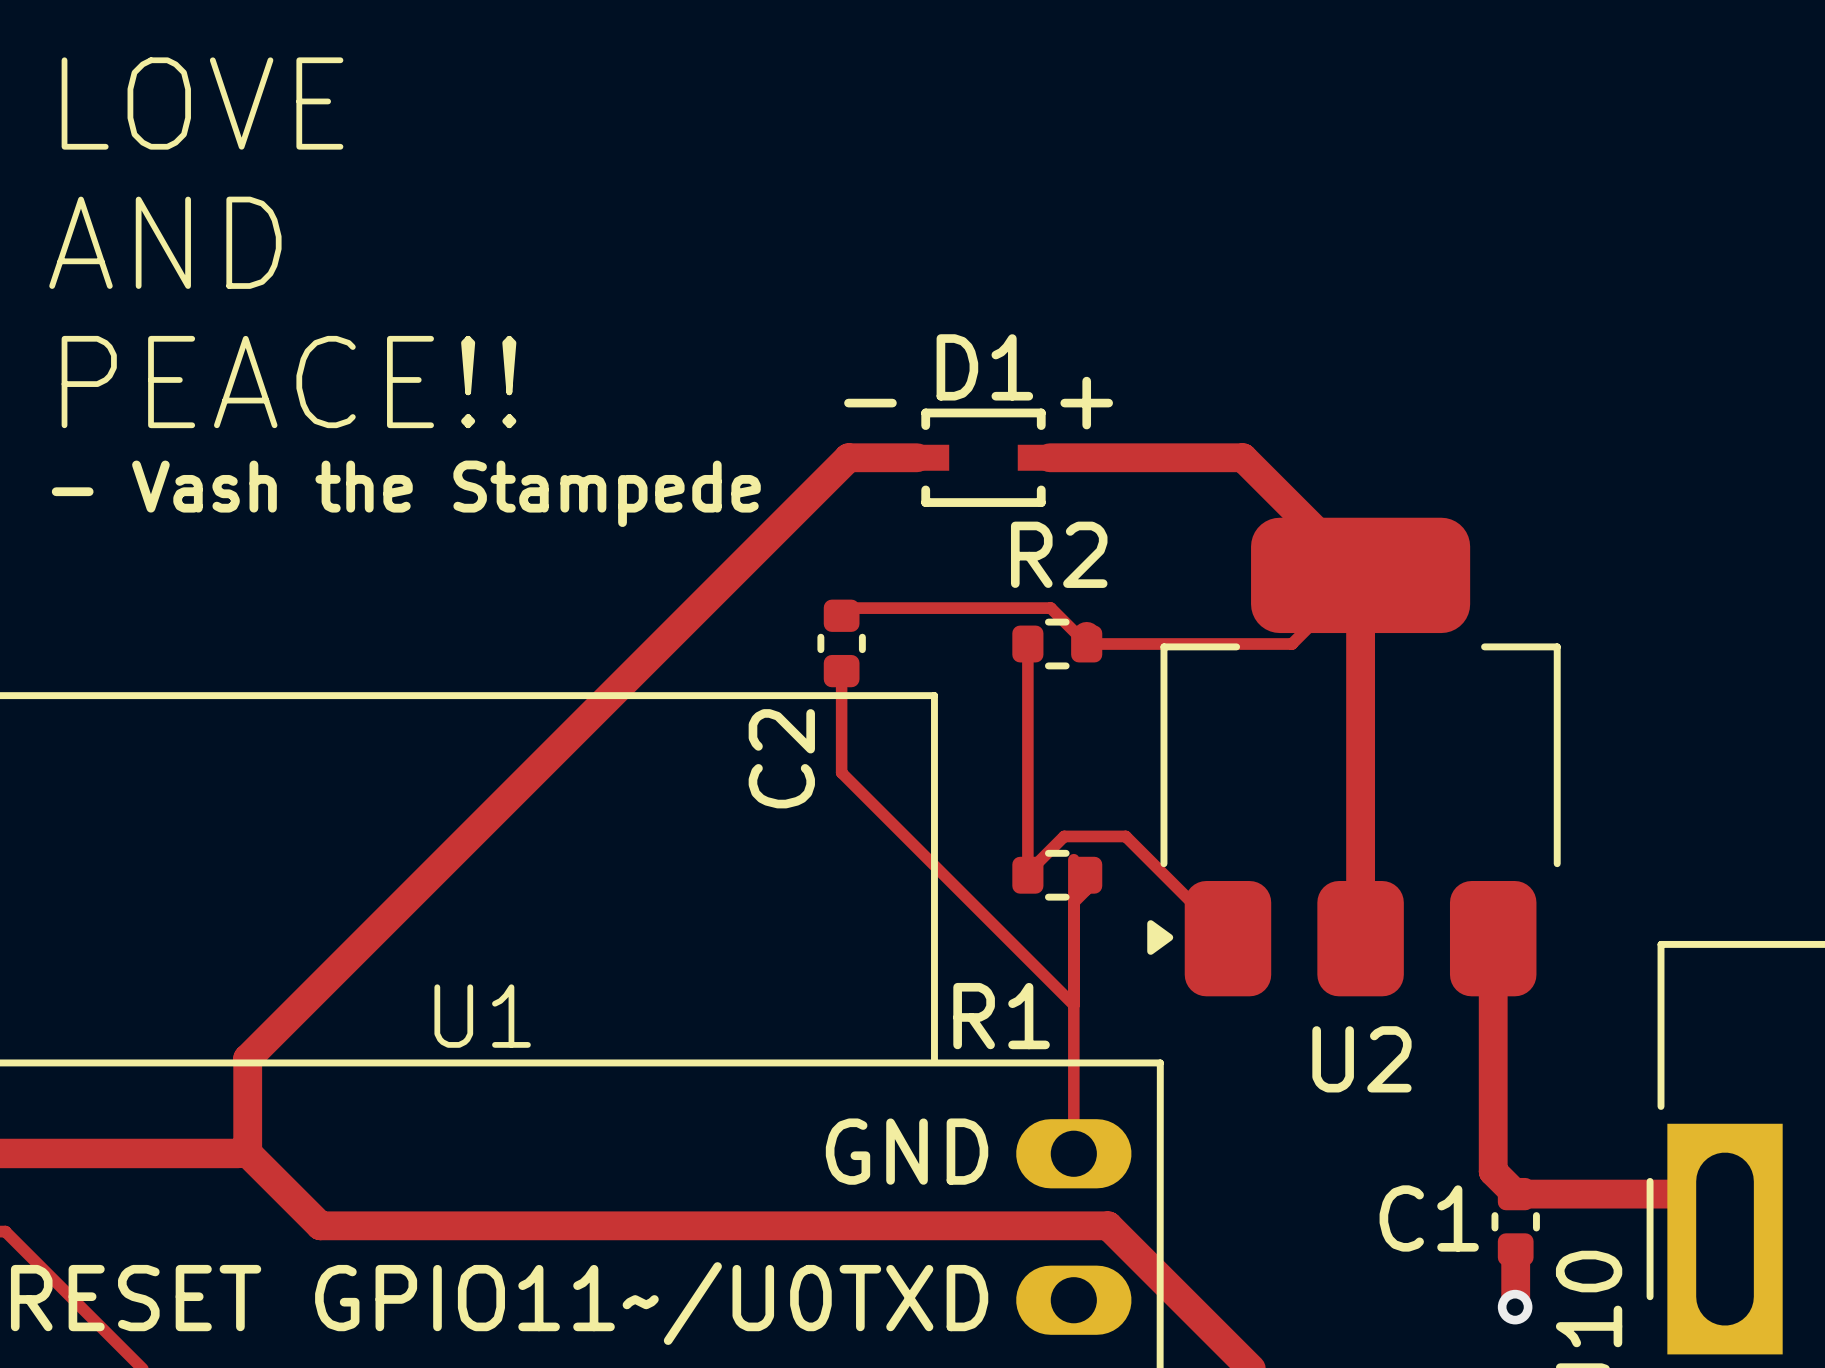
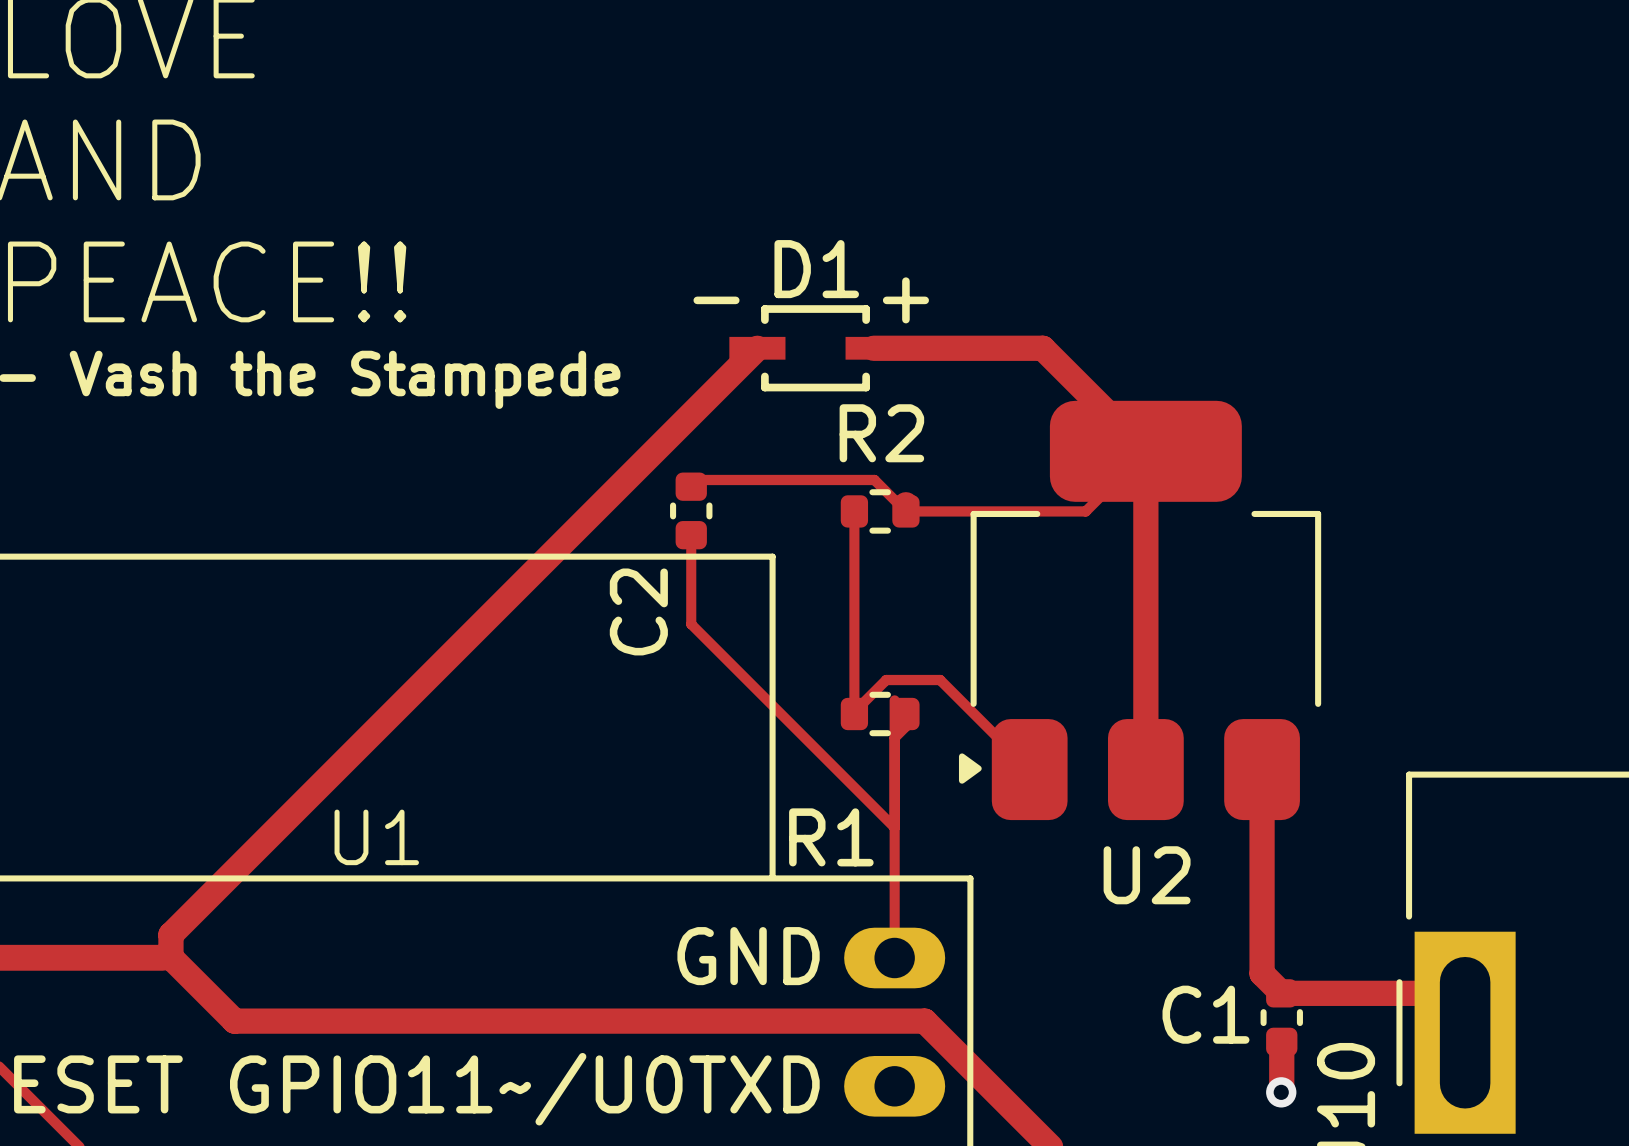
track: (917, 457) (848, 457) (247, 1058) (247, 1127) -> (757, 348) (170, 934)

